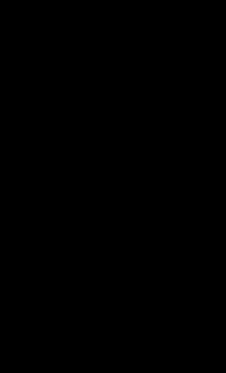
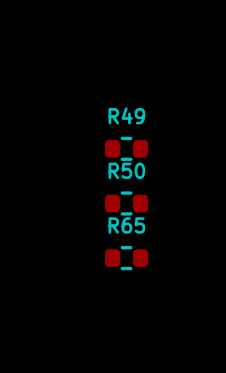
R49: none -> (126, 148)
R50: none -> (126, 203)
R65: none -> (126, 258)

